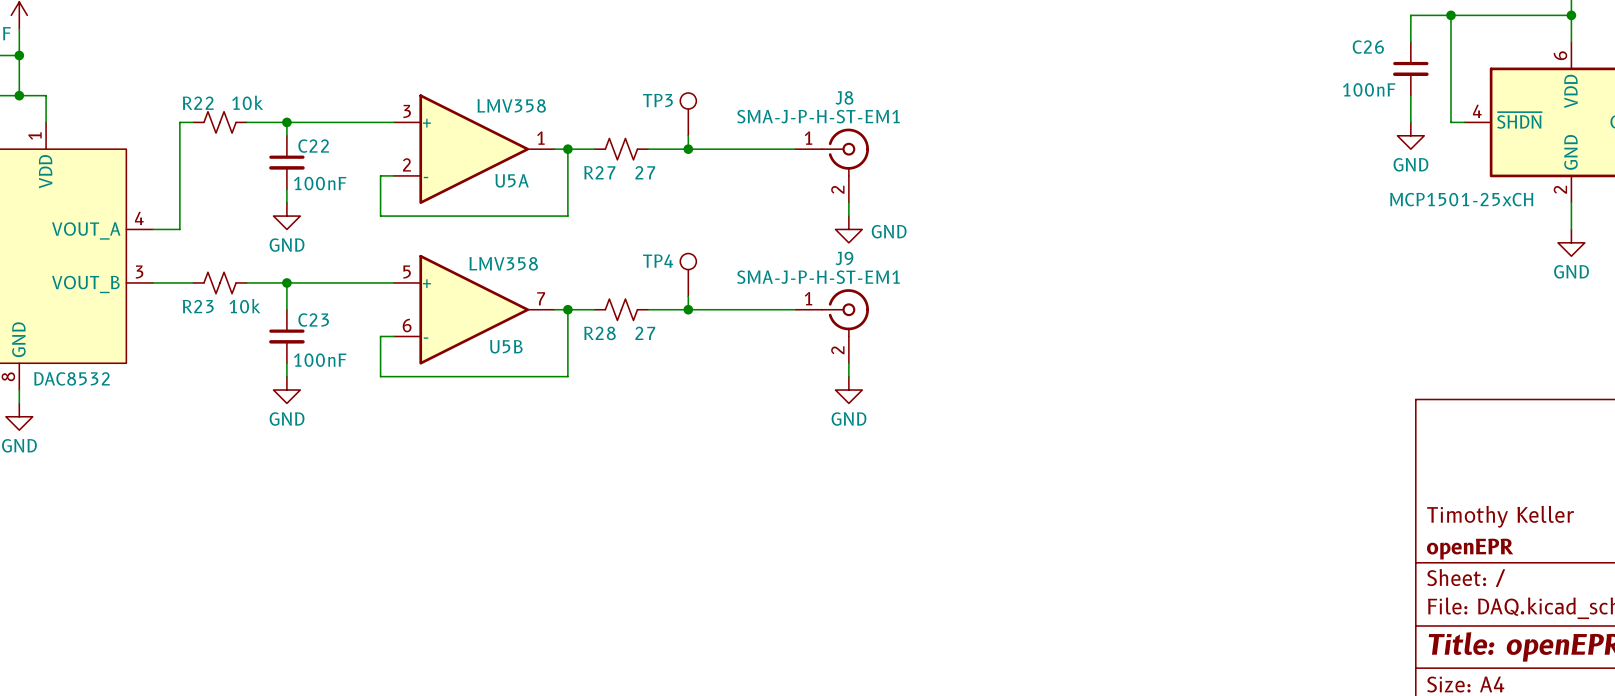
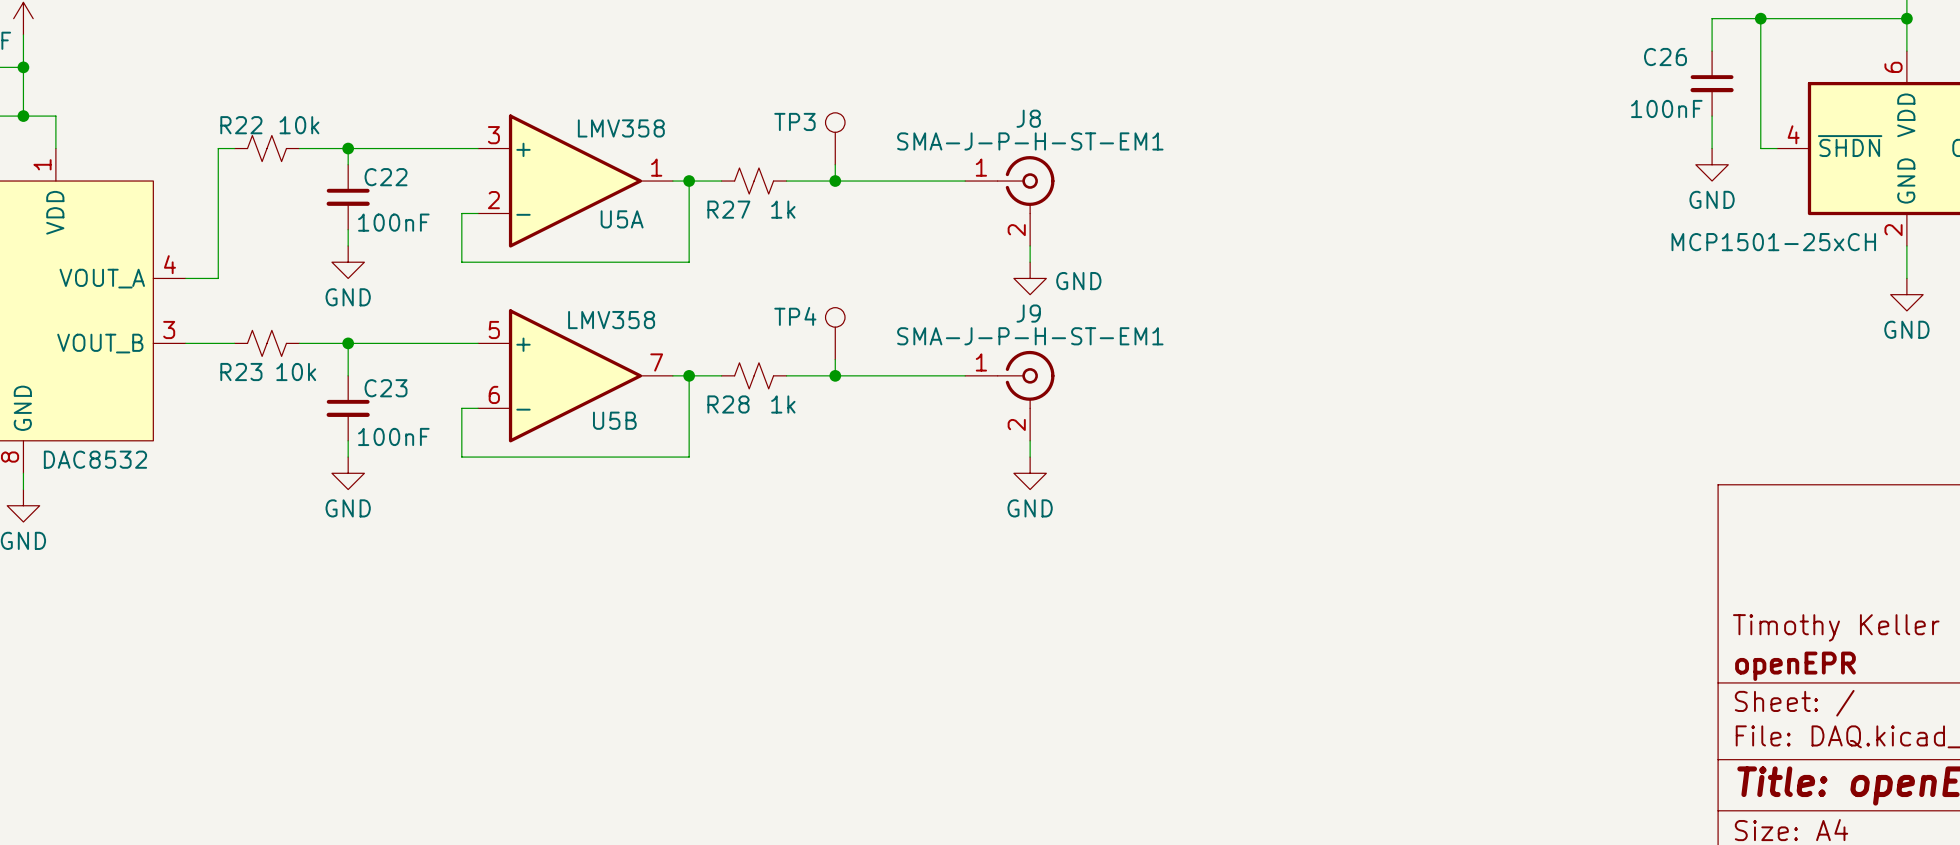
R27 value: 27 (645, 172) -> 1k (783, 209)
R28 value: 27 (645, 333) -> 1k (783, 404)

